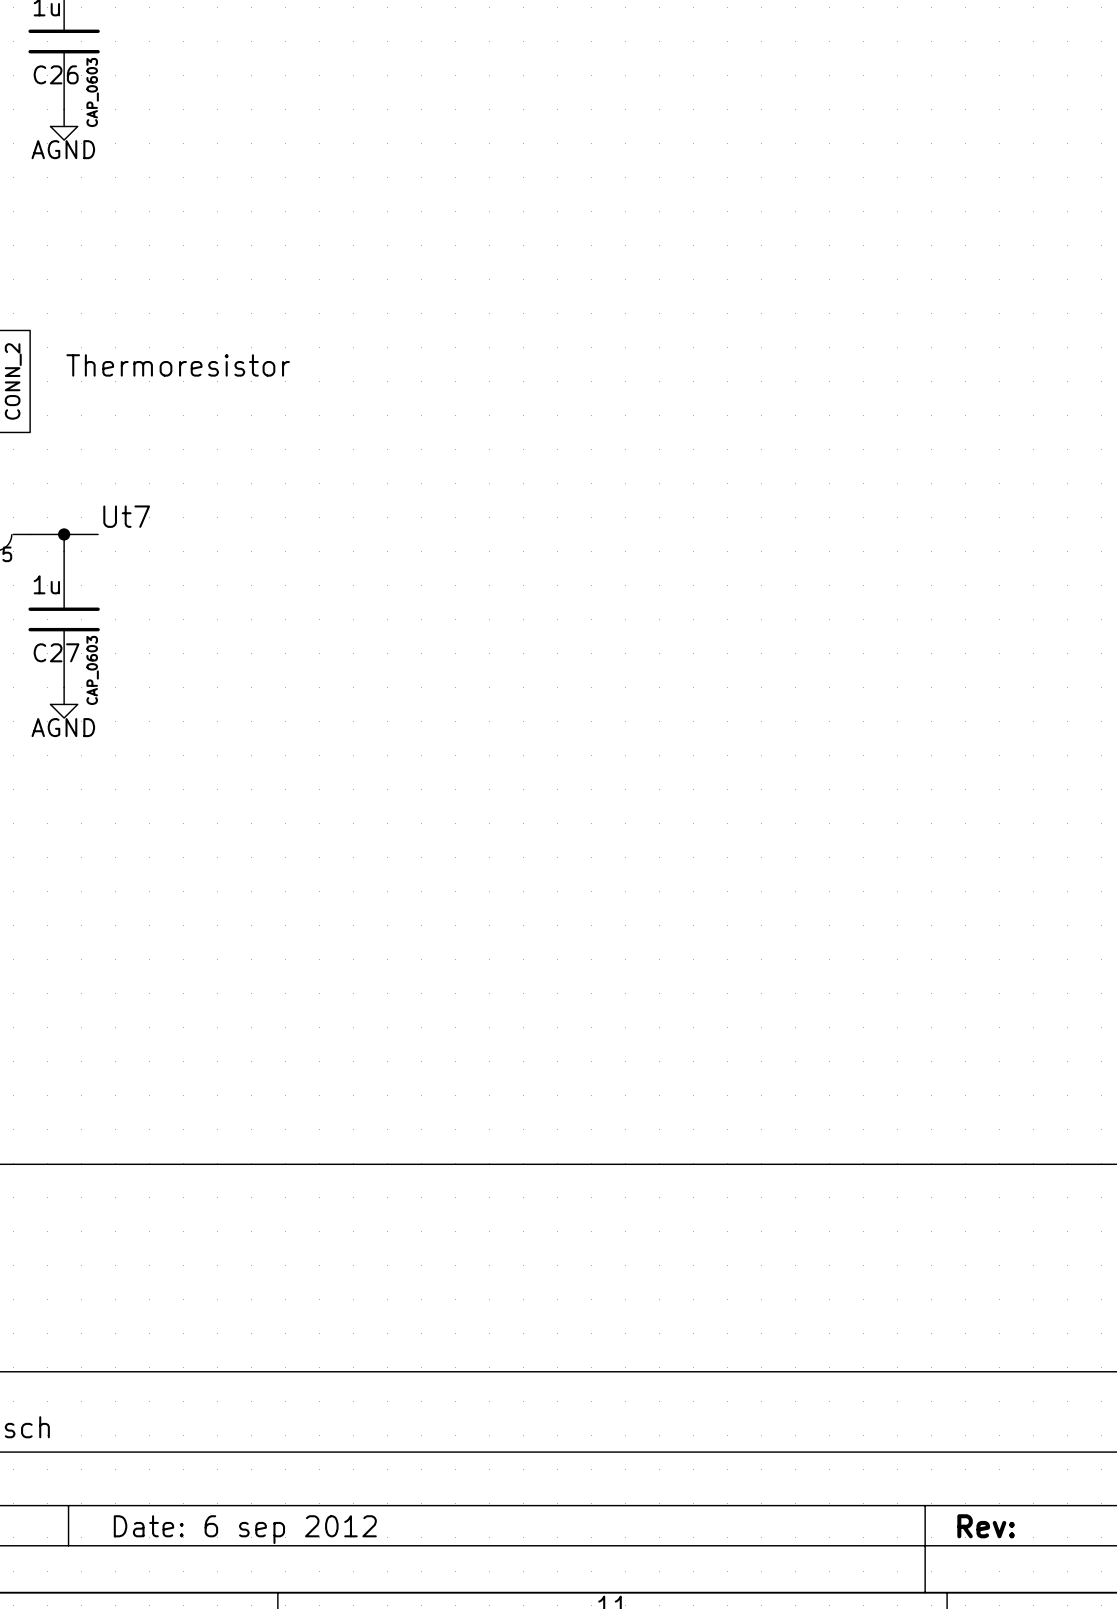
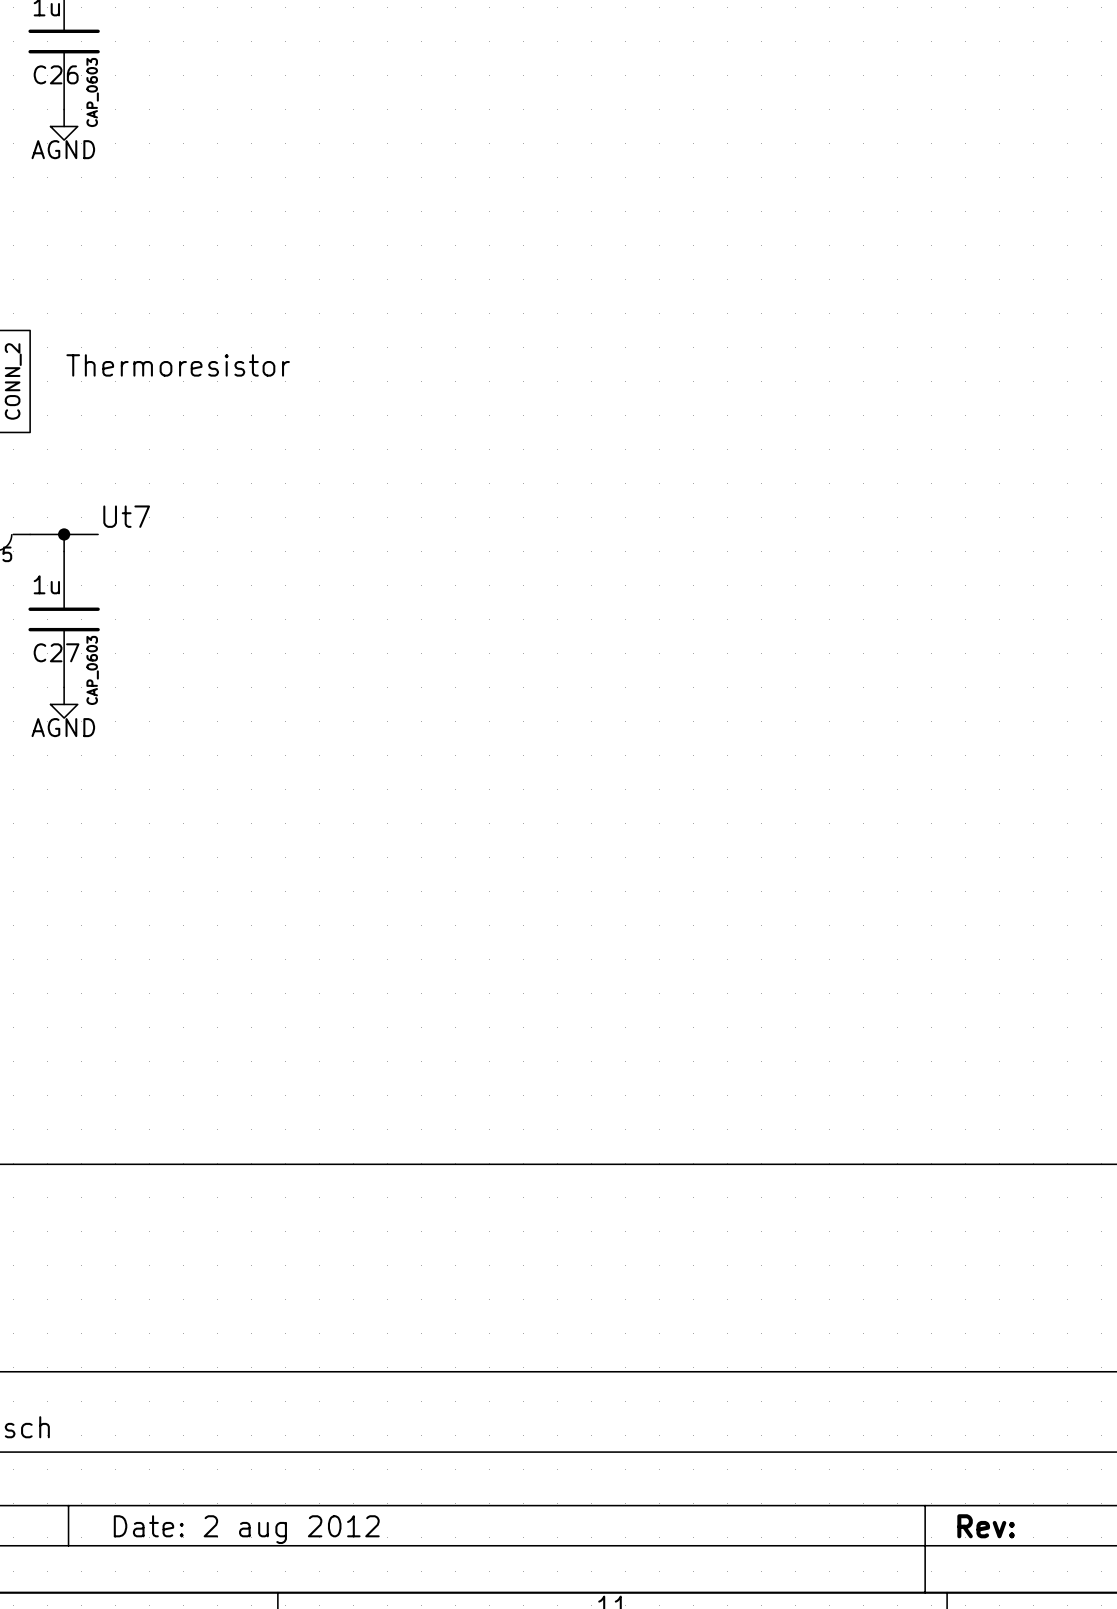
title block: Date: 6 sep 2012 (245, 1529) -> Date: 2 aug 2012 (246, 1529)

